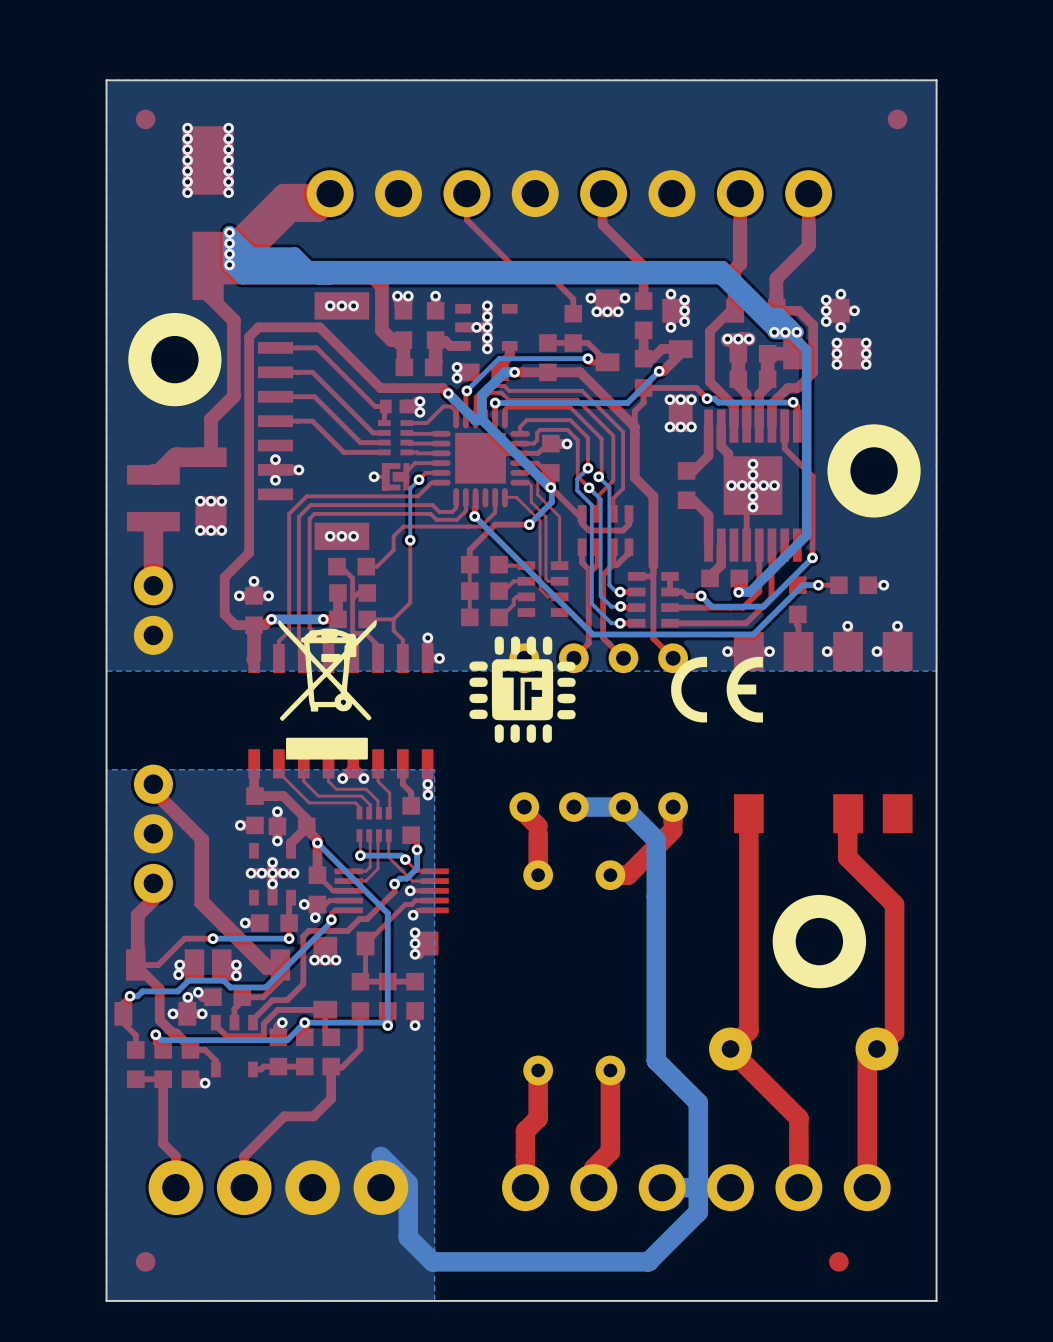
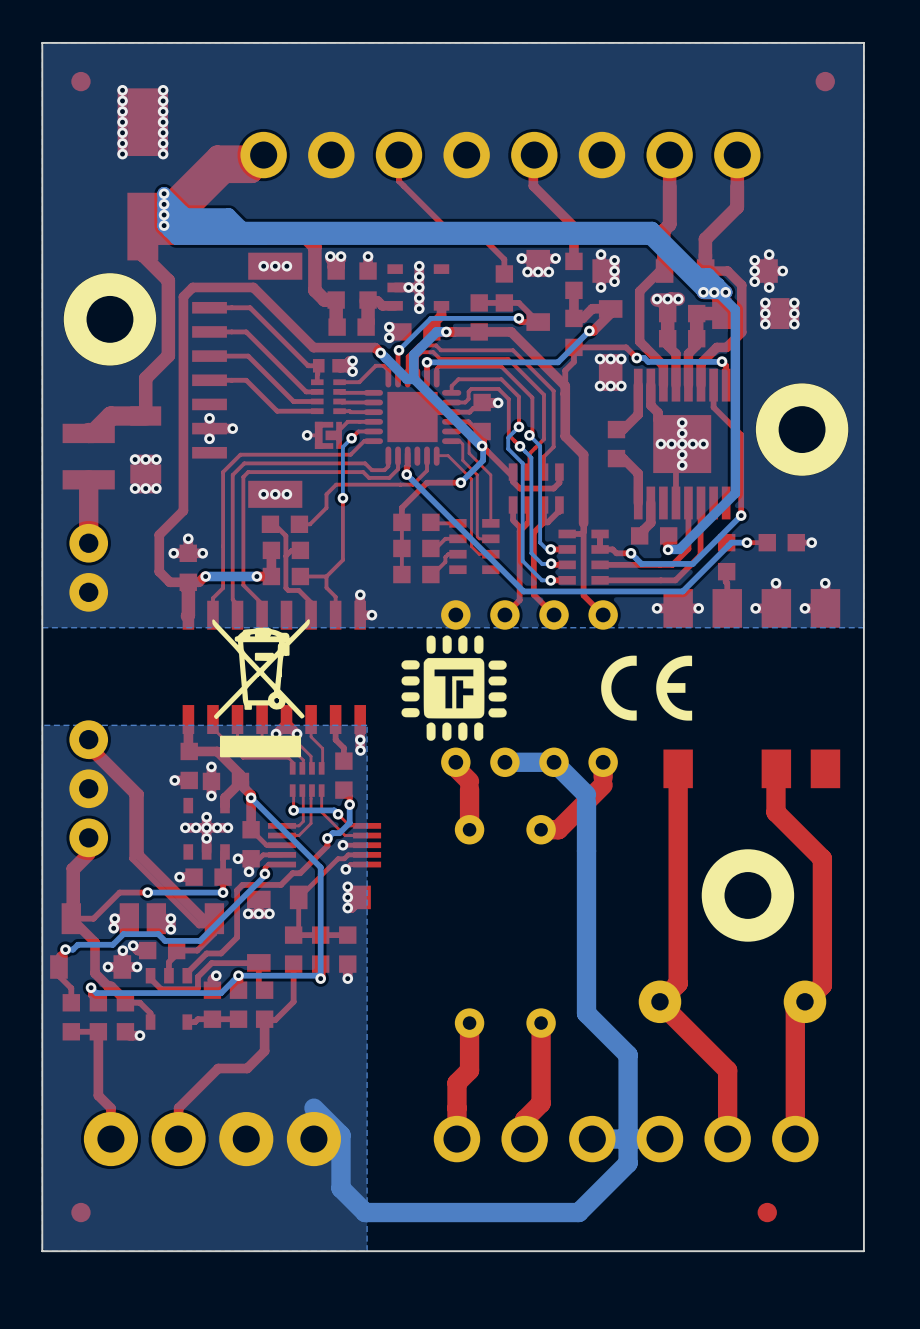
drawing position: (327, 689) -> (261, 688)
drawing position: (522, 689) -> (454, 688)
drawing position: (717, 689) -> (646, 688)

